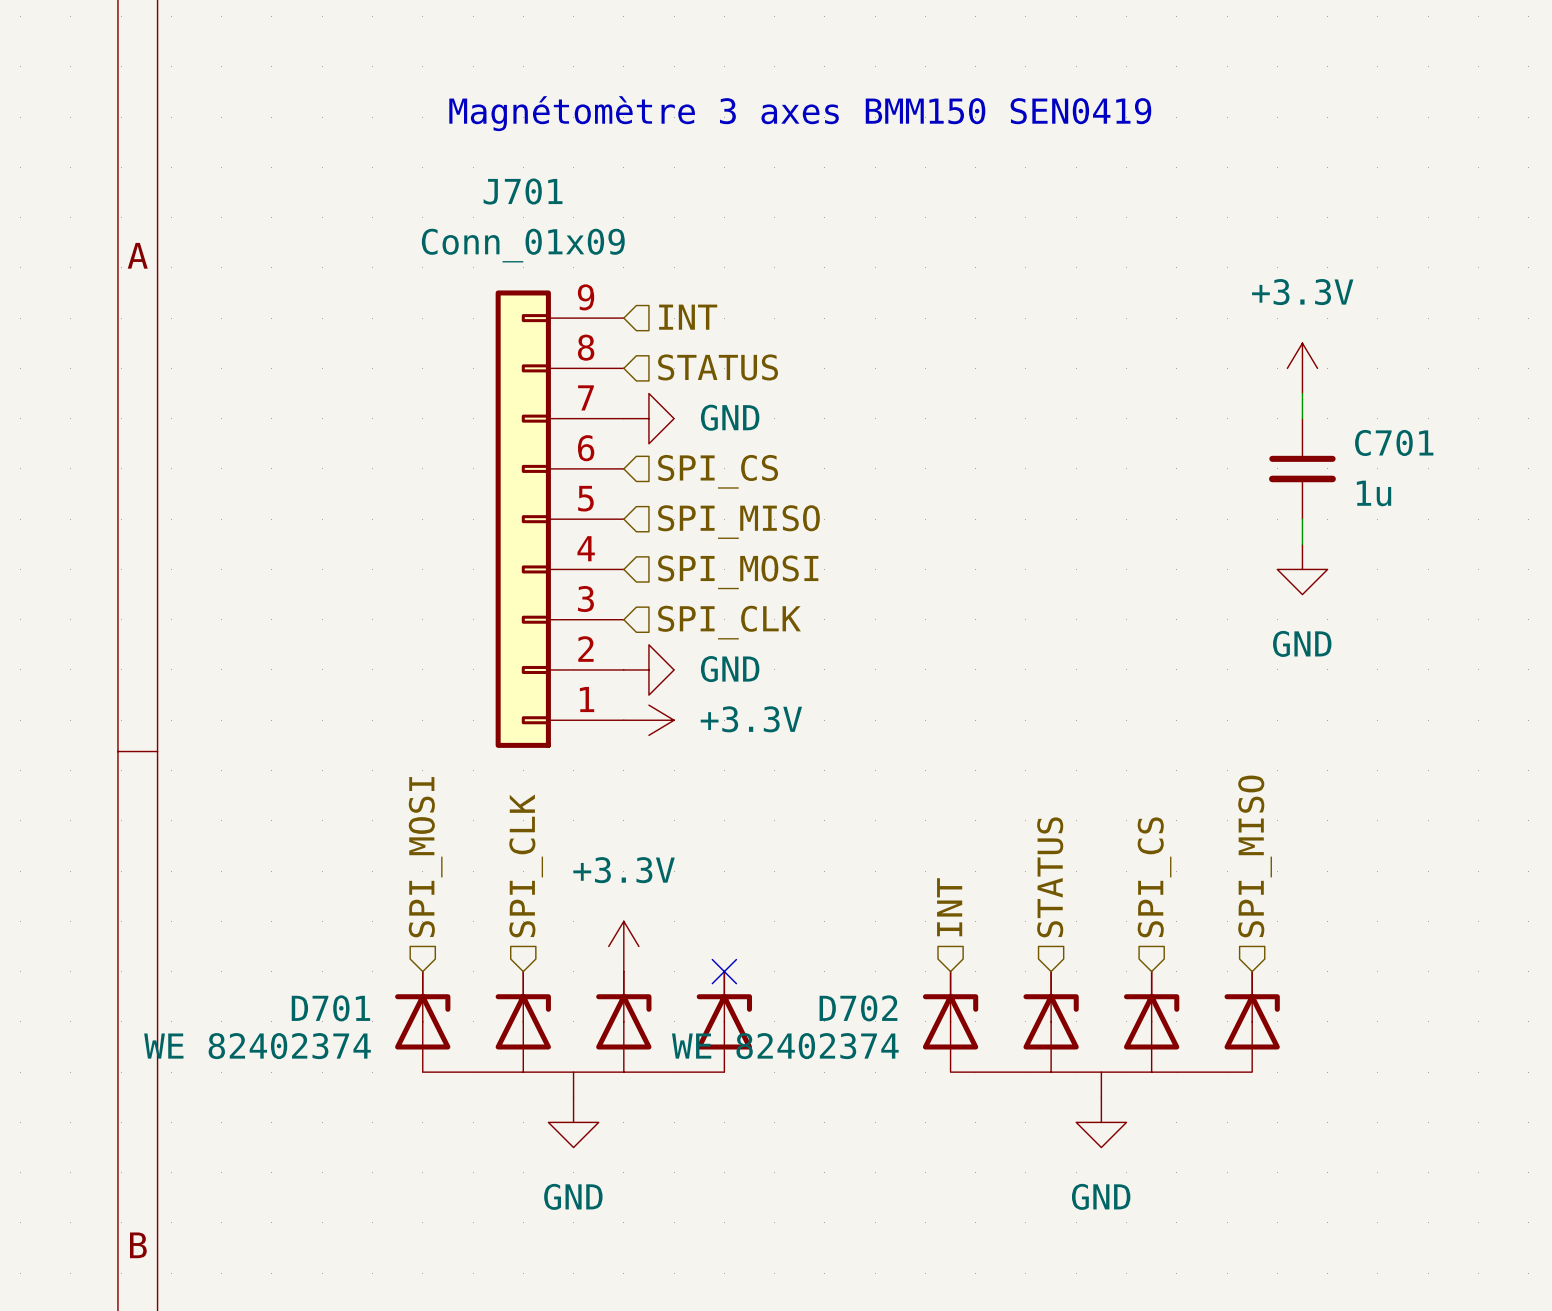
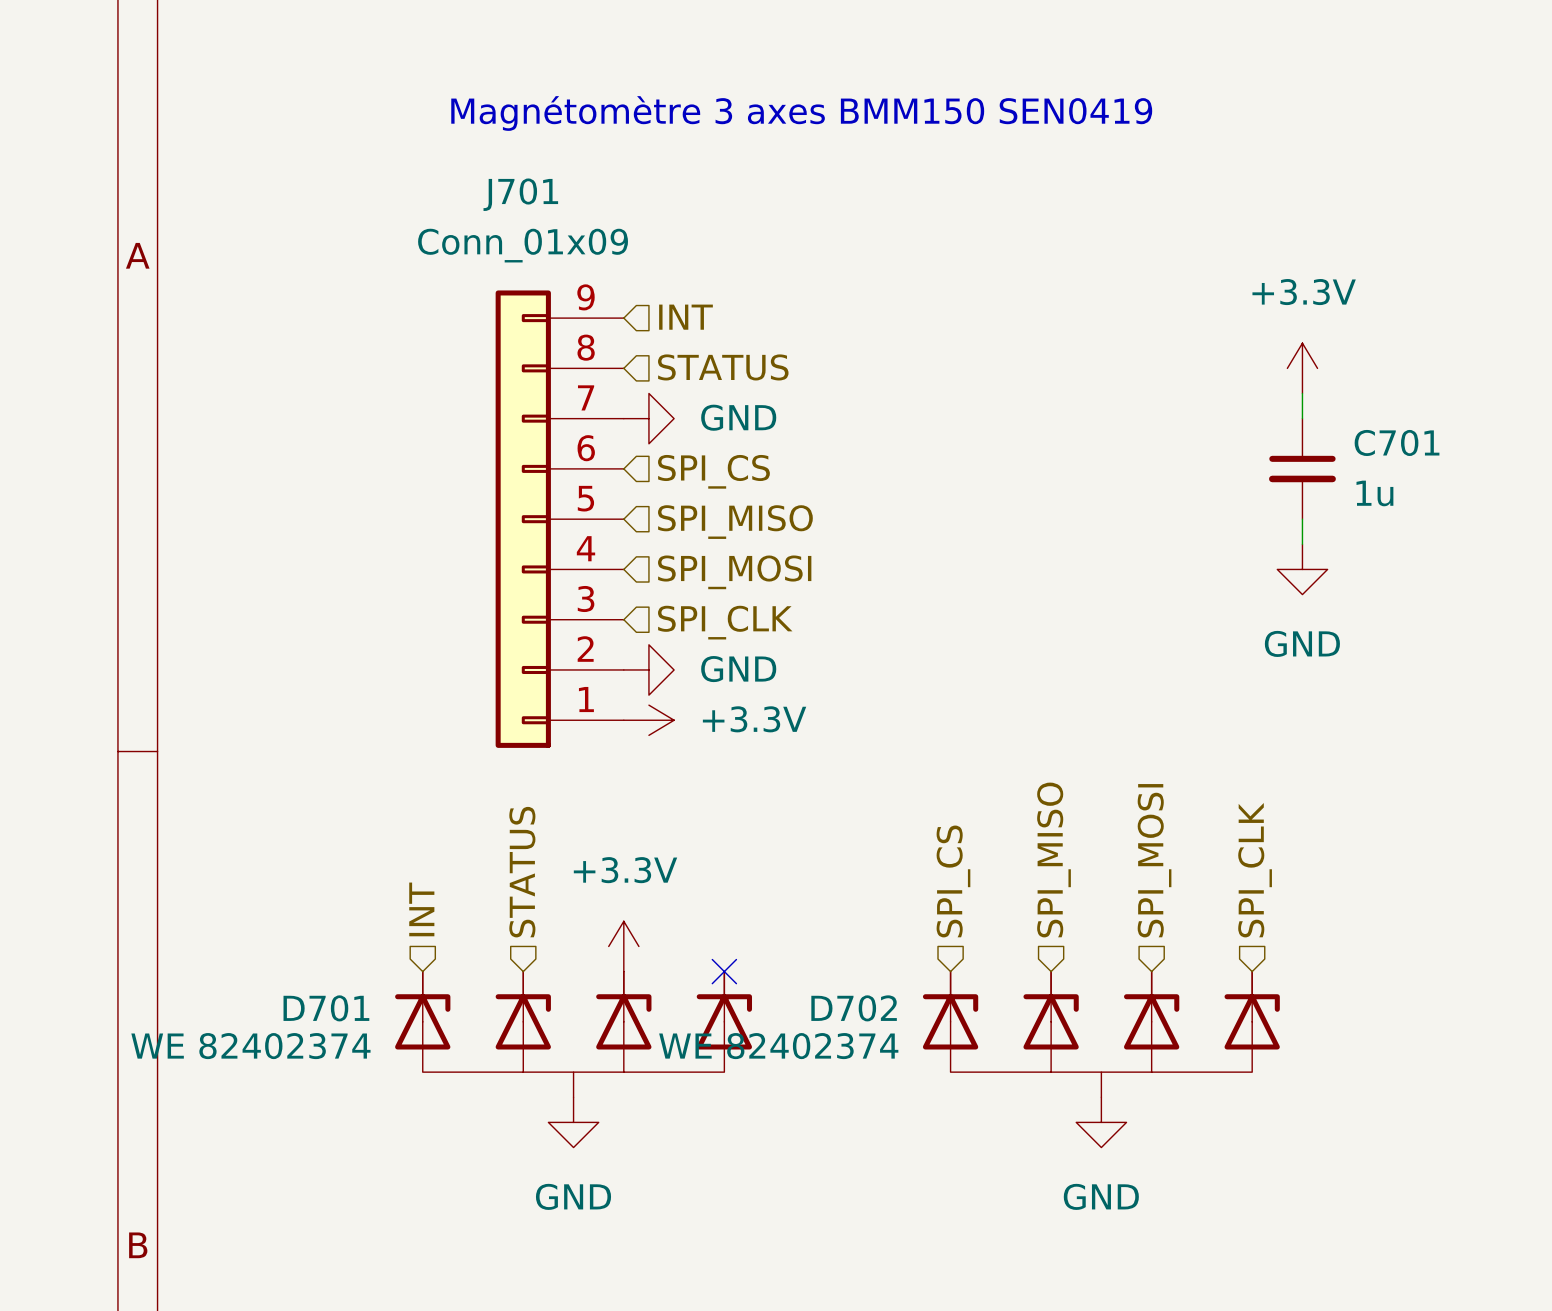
hierarchical label: SPI_MISO (1255, 856) -> SPI_CLK (1255, 870)
hierarchical label: SPI_MOSI (425, 857) -> INT (421, 909)
hierarchical label: SPI_CLK (526, 865) -> STATUS (522, 872)
hierarchical label: STATUS (1050, 877) -> SPI_MISO (1054, 860)
hierarchical label: SPI_CS (1154, 877) -> SPI_MOSI (1154, 860)
hierarchical label: INT (949, 907) -> SPI_CS (953, 881)

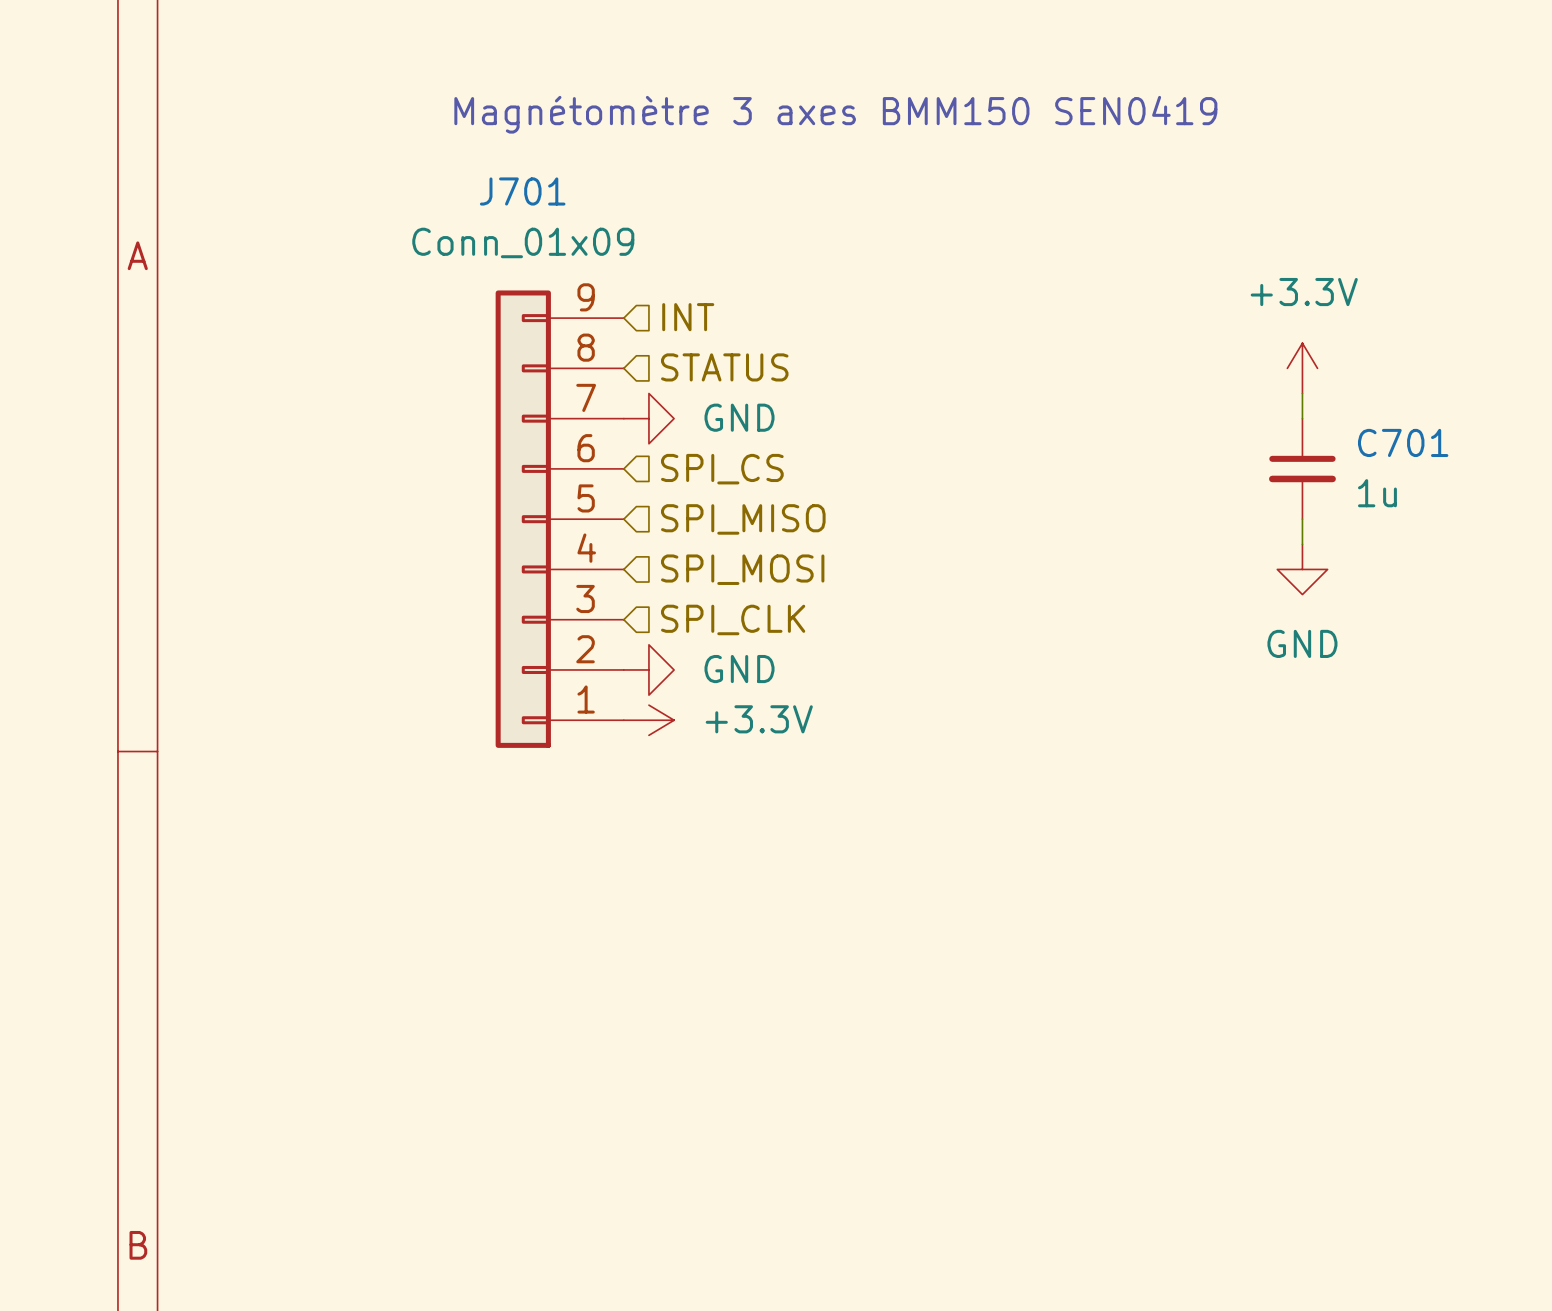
hierarchical label: SPI_MISO (1054, 860) -> none
hierarchical label: SPI_MOSI (1154, 860) -> none
hierarchical label: SPI_CLK (1255, 870) -> none
hierarchical label: STATUS (522, 872) -> none
hierarchical label: SPI_CS (953, 881) -> none
hierarchical label: INT (421, 909) -> none
power symbol: +3.3V (623, 946) -> none
no-connect mark: (724, 971) -> none
D701: WE 82402374 (573, 1034) -> none
D702: WE 82402374 (1101, 1034) -> none
power symbol: GND (573, 1122) -> none
power symbol: GND (1101, 1122) -> none

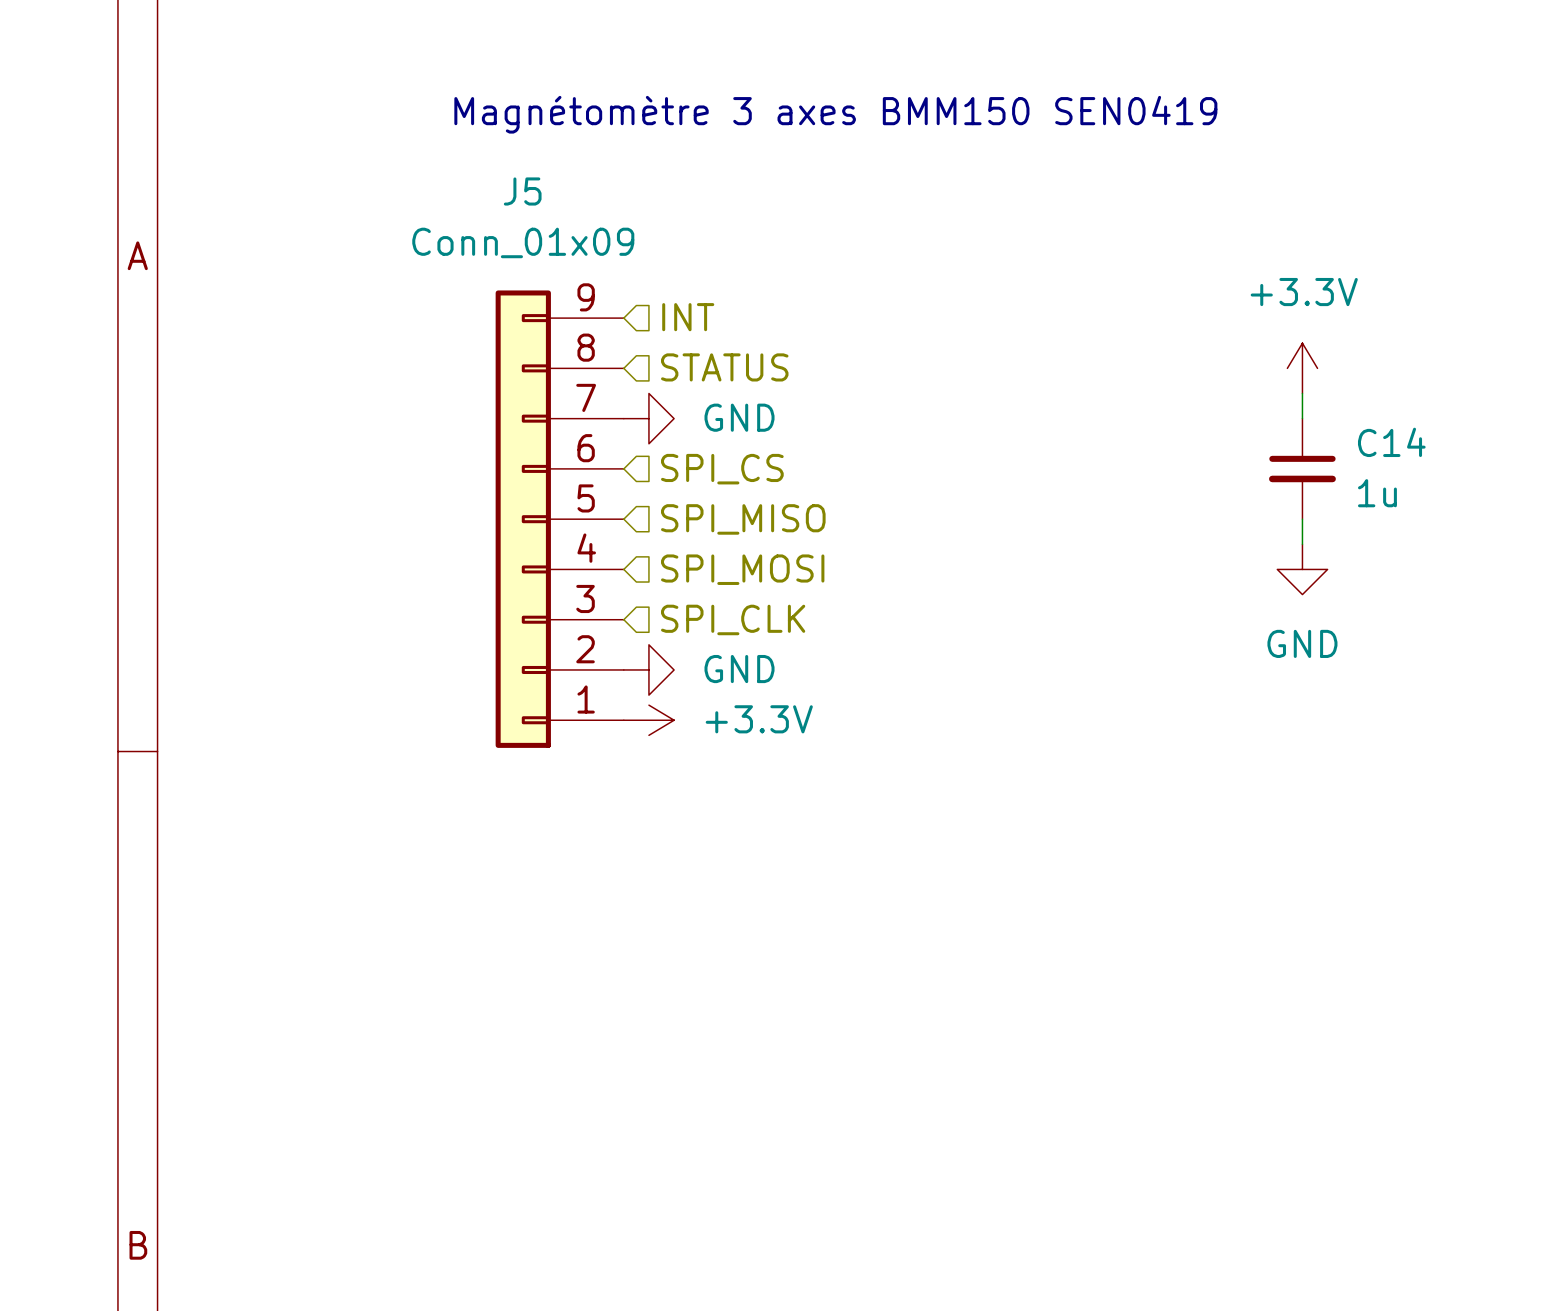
J701 name: J701 (522, 191) -> J5 (522, 191)
C701 name: C701 (1403, 442) -> C14 (1391, 442)

